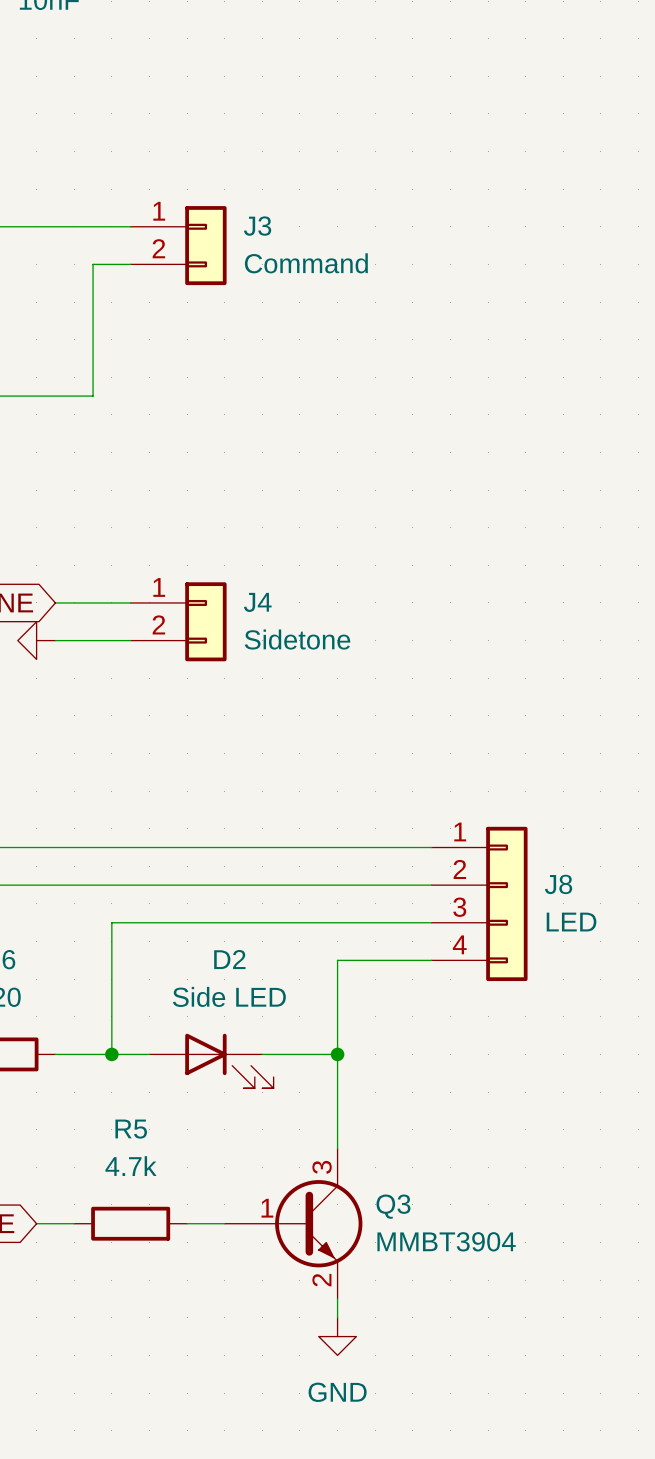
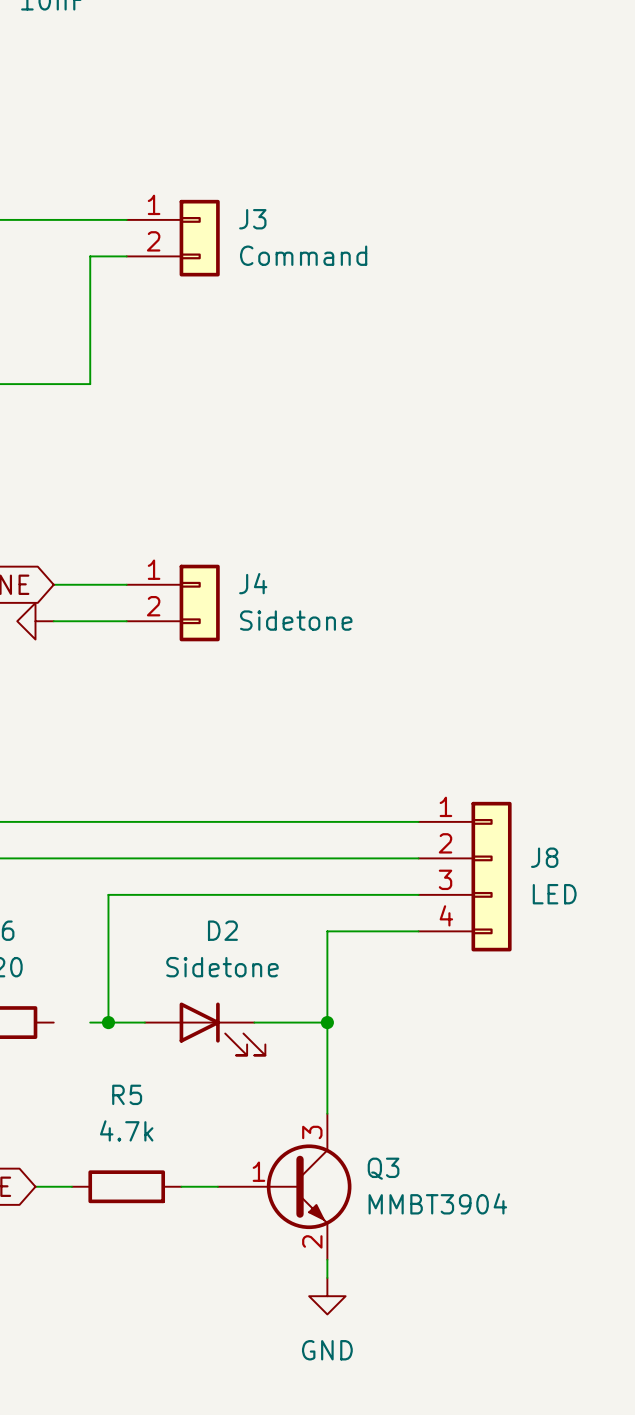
D2 value: Side LED (229, 996) -> Sidetone (222, 967)
wire: (55, 1054) (93, 1054) -> none

